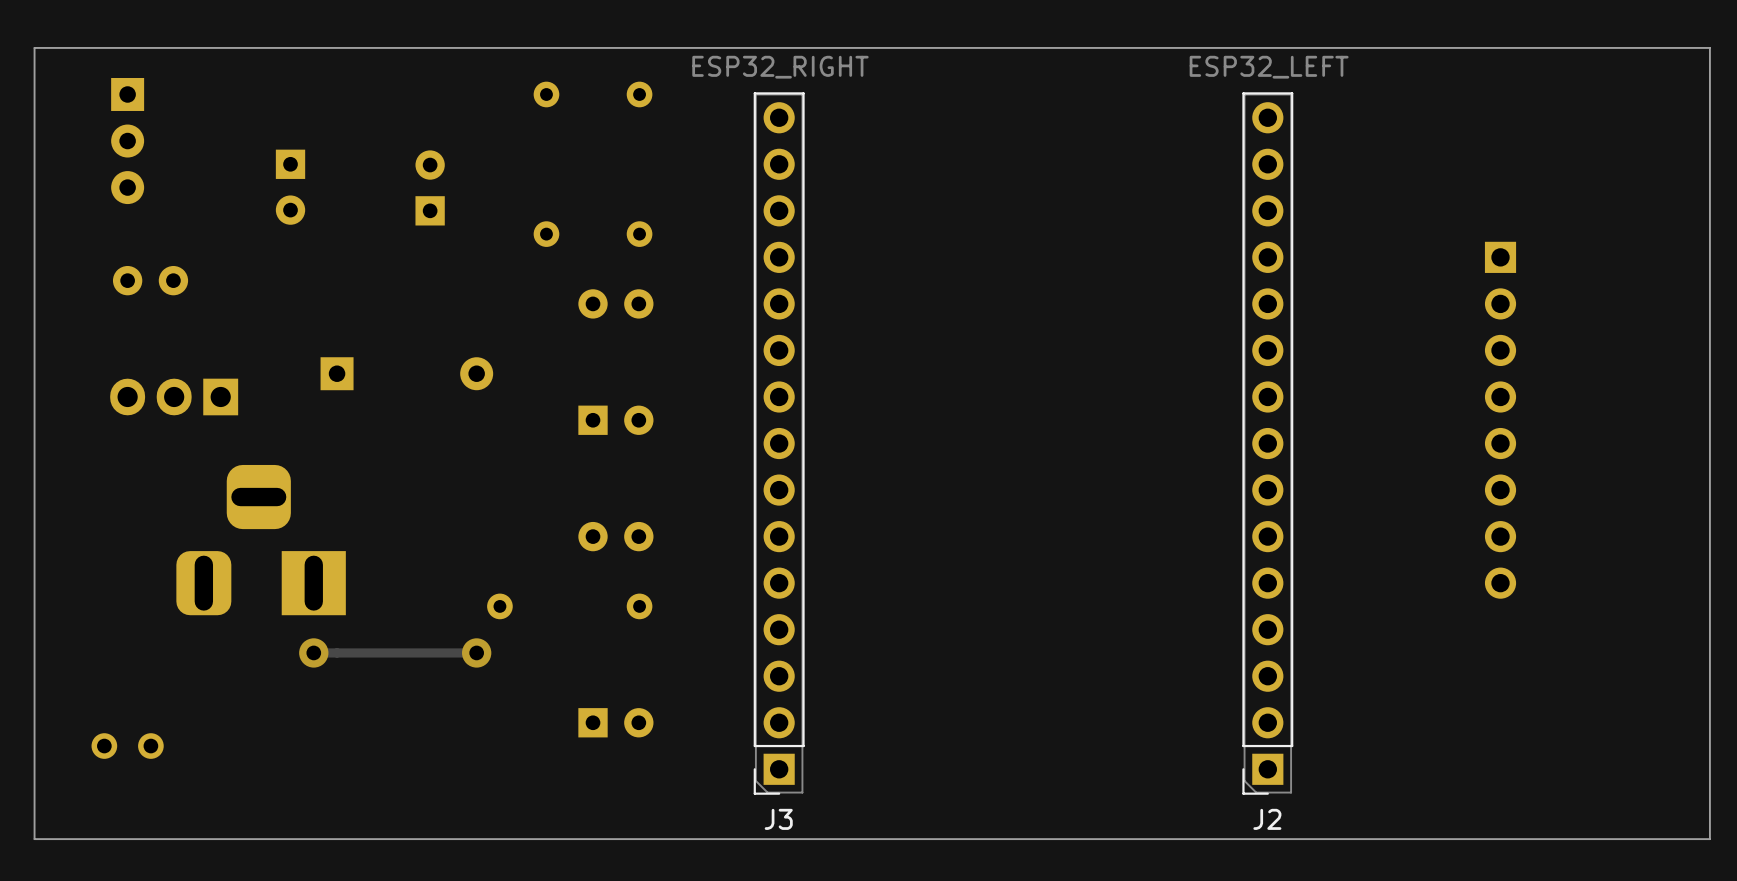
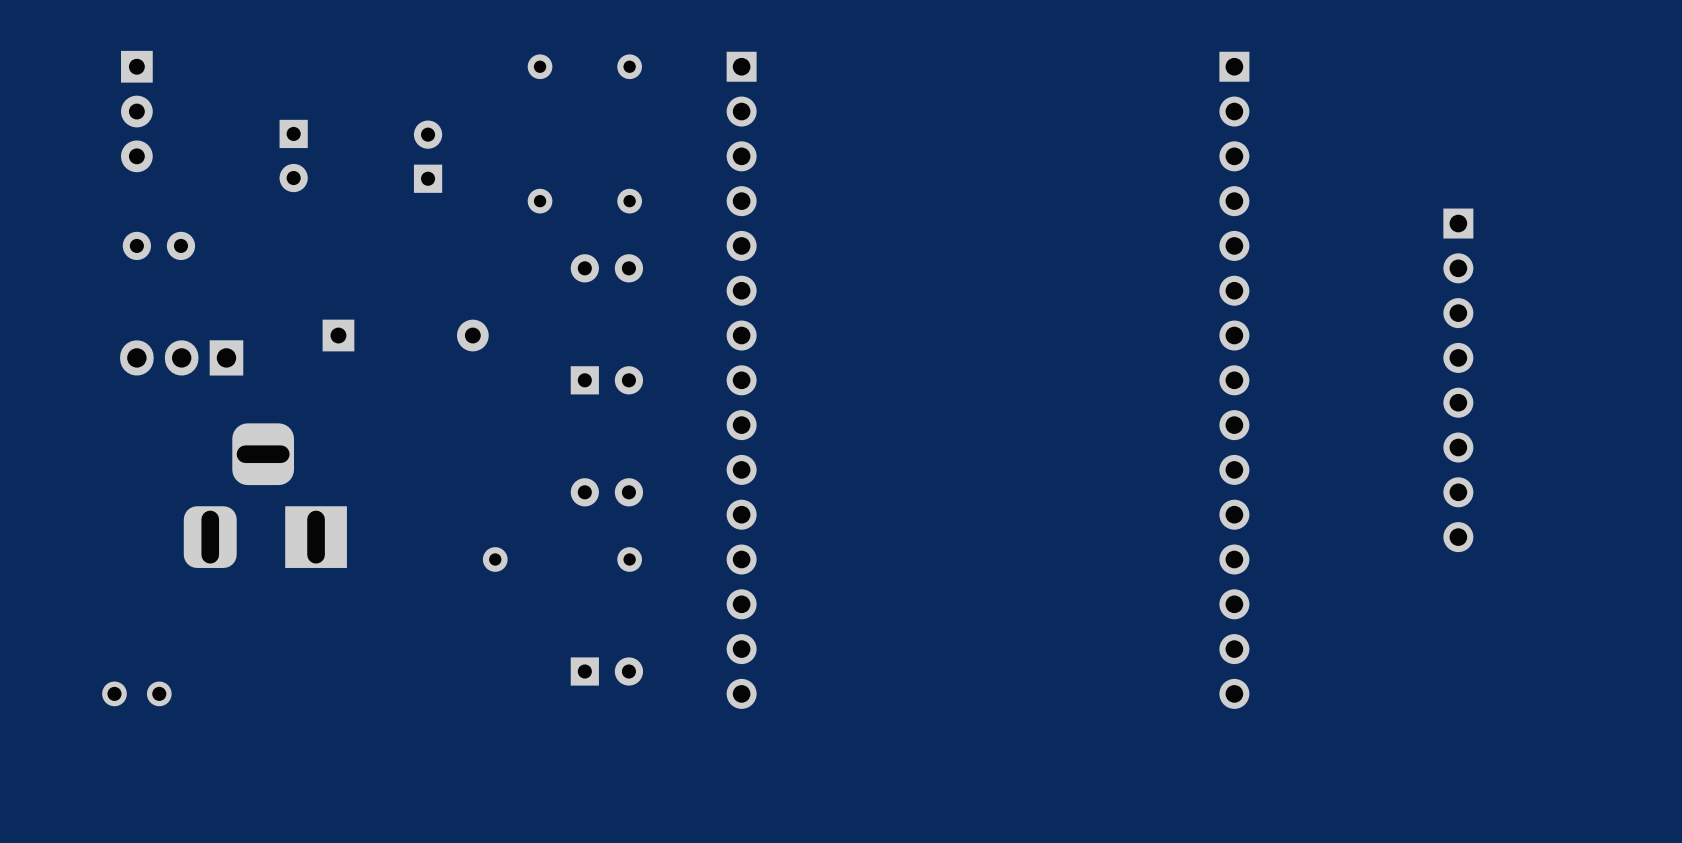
board edge: (1709, 47) (34, 47) (34, 839) (1709, 839) (1709, 47) -> none
J3 side: bottom (779, 443) -> top (741, 380)
J2 side: bottom (1267, 443) -> top (1234, 380)
via: (313, 652) -> none
track: (476, 652) (313, 652) -> none
via: (476, 652) -> none

